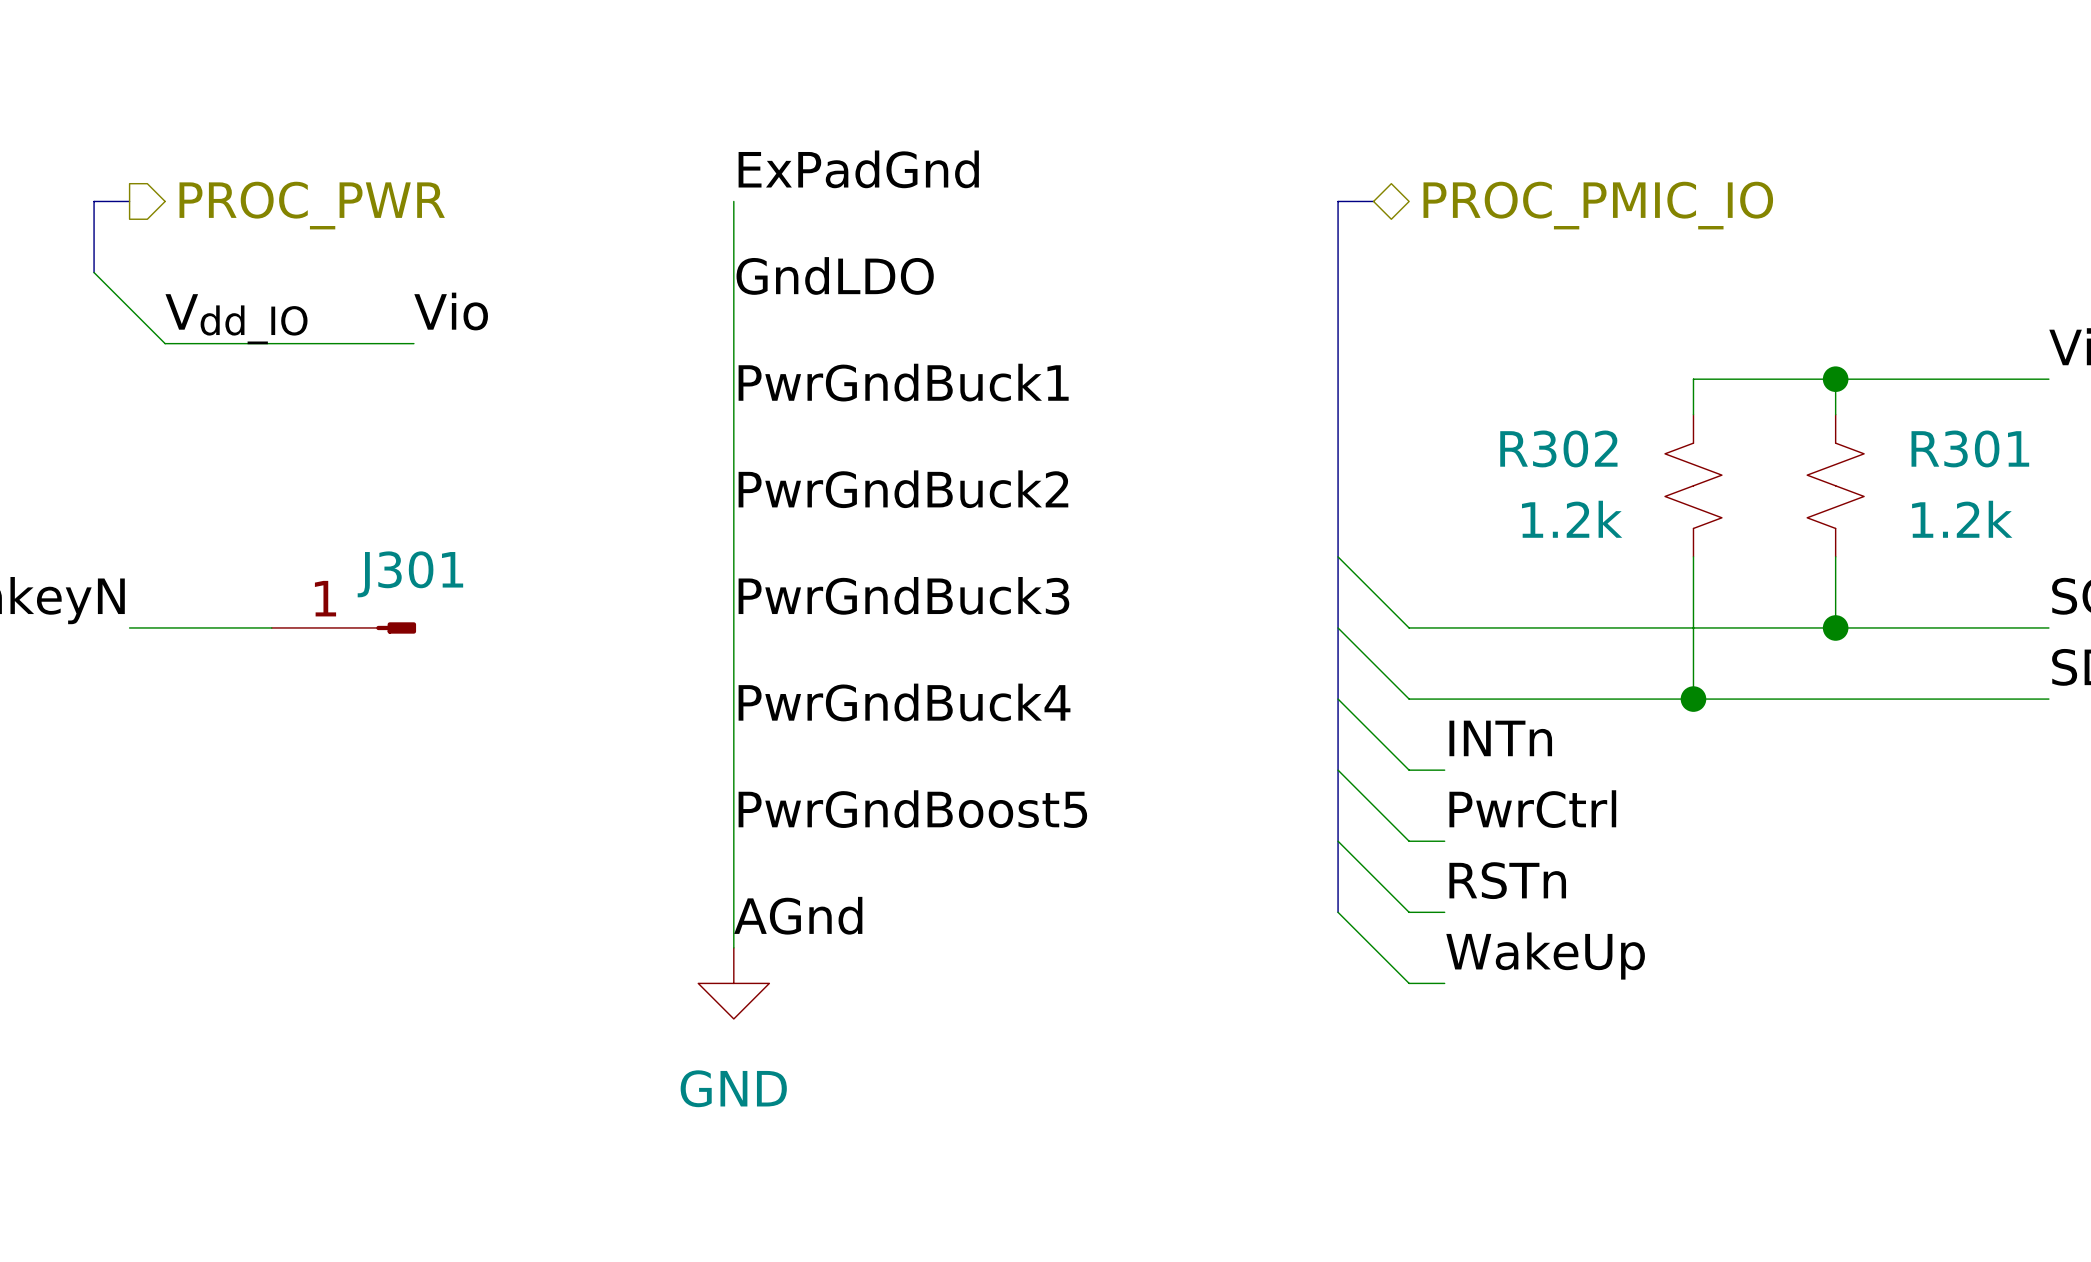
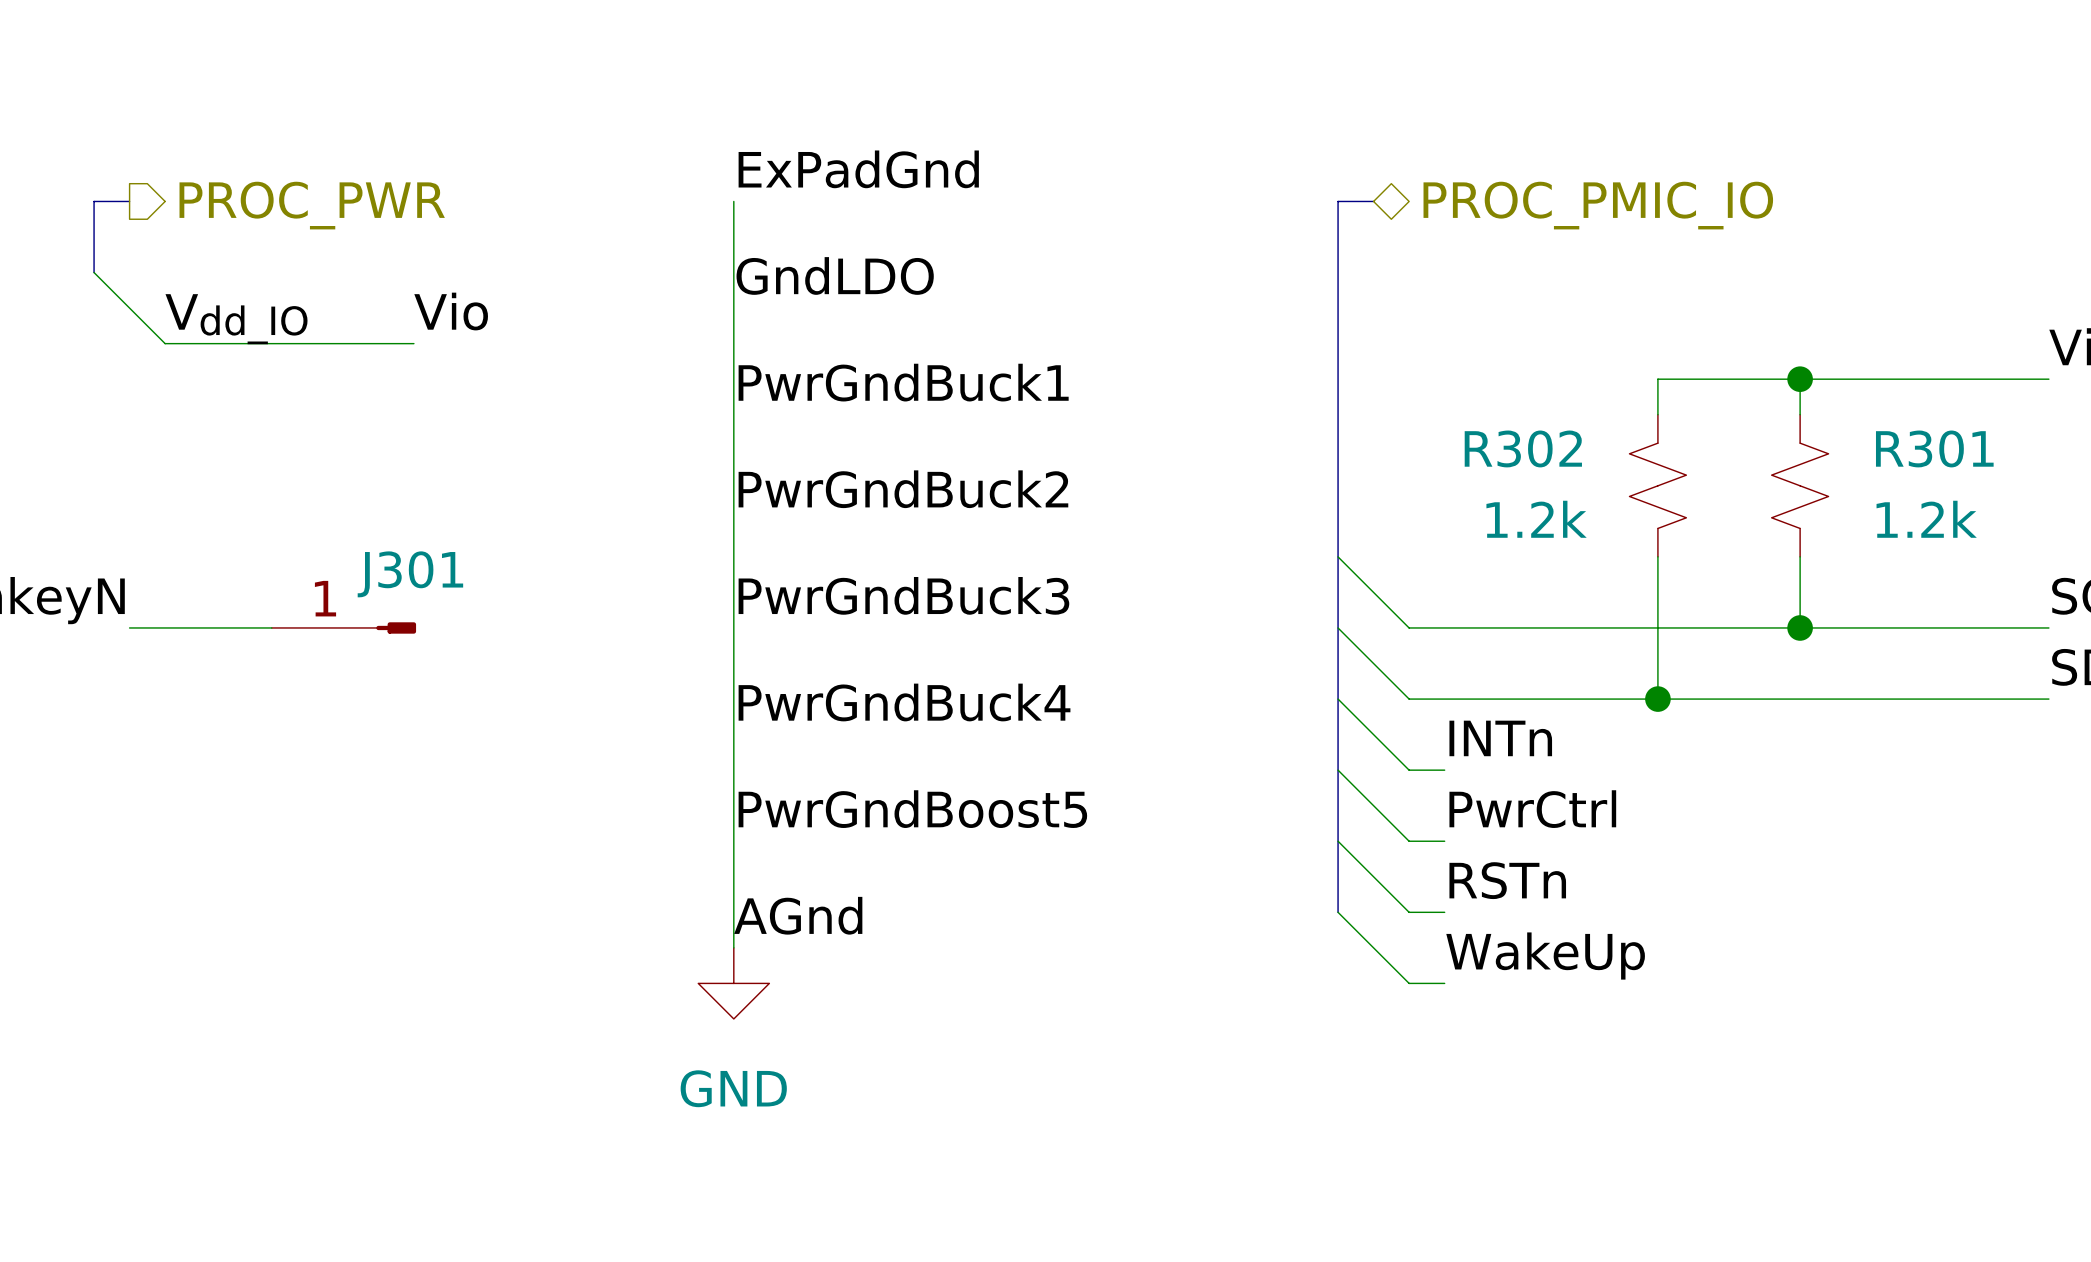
wire: (1693, 379) (1693, 414) -> (1693, 379) (1657, 379) (1657, 414)
wire: (1835, 379) (1835, 414) -> (1800, 379) (1800, 414)
junction position: (1835, 379) -> (1800, 379)
R302 position: (1693, 485) -> (1657, 485)
R301 position: (1835, 485) -> (1800, 485)
wire: (1693, 556) (1693, 699) -> (1657, 556) (1657, 699)
wire: (1835, 556) (1835, 627) -> (1800, 556) (1800, 627)
junction position: (1835, 627) -> (1800, 627)
junction position: (1693, 699) -> (1657, 699)

